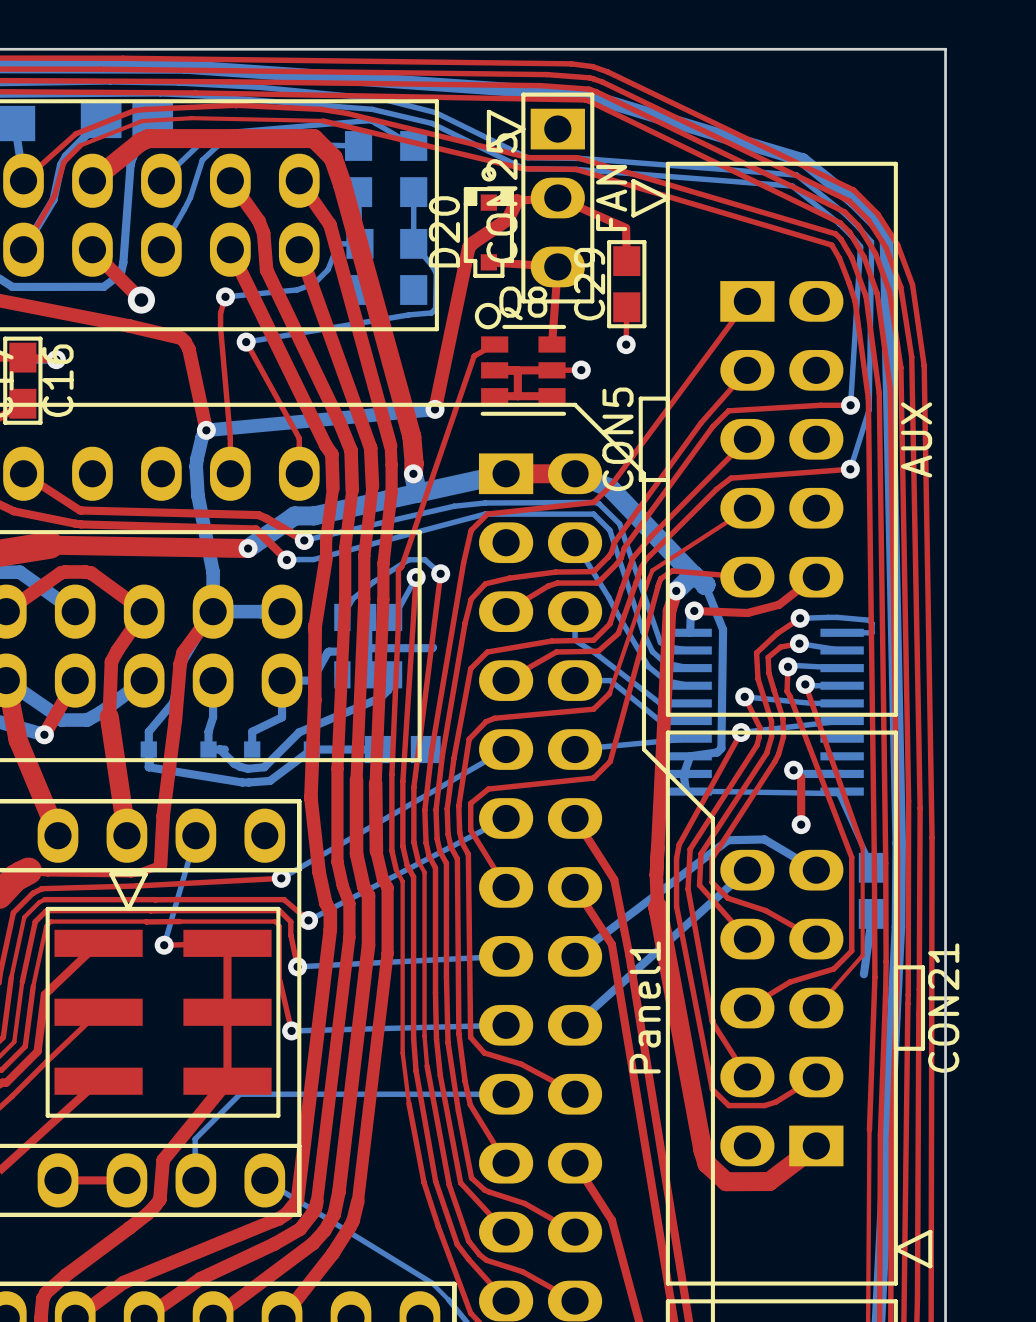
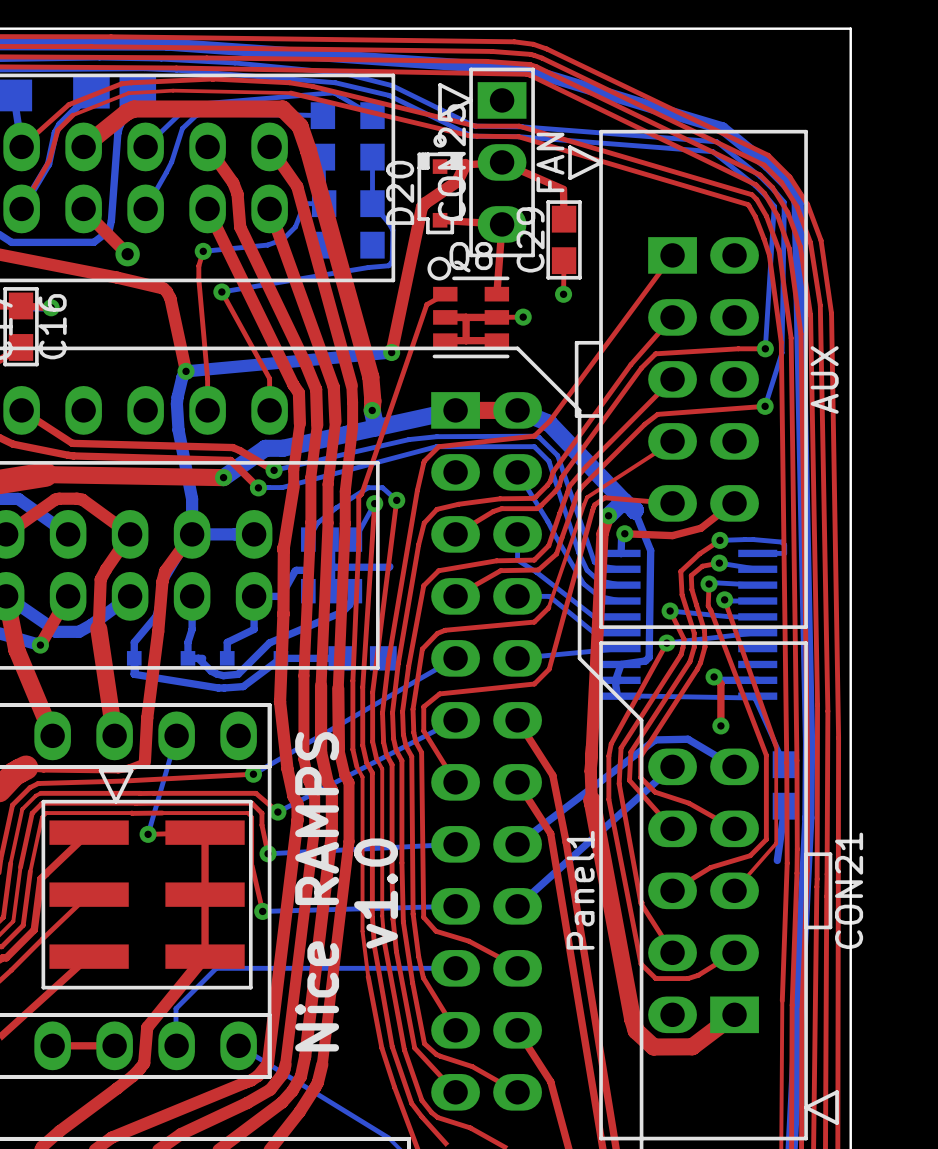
CON5 name: CON5 (618, 439) -> none
text: none -> Nice RAMPS (317, 891)
text: none -> v1.0 (376, 893)

